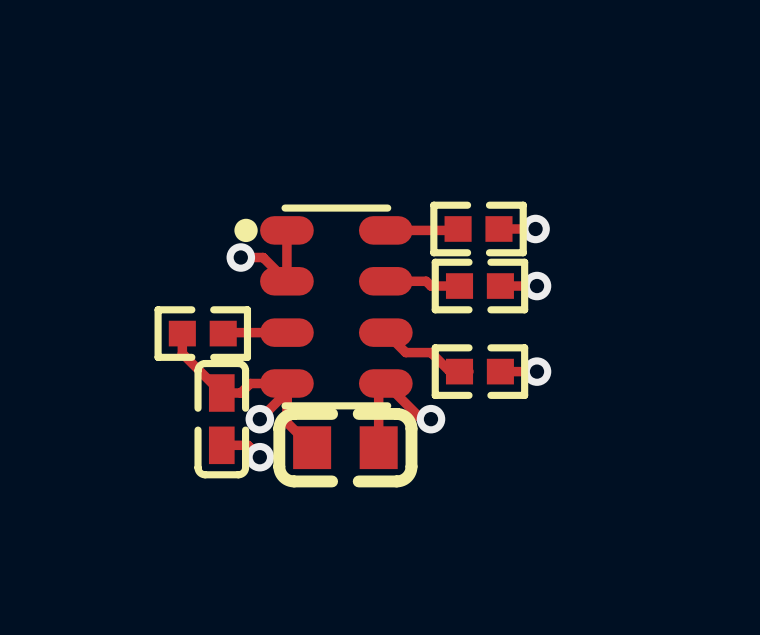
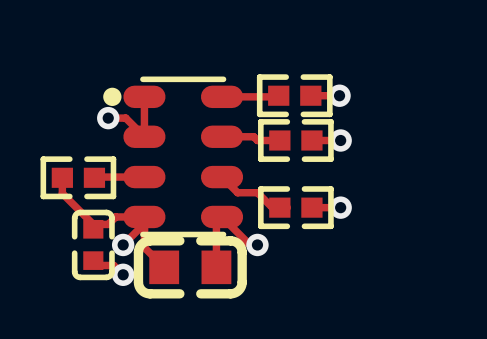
part footprint: [194, 359, 250, 479] -> [71, 209, 115, 281]

